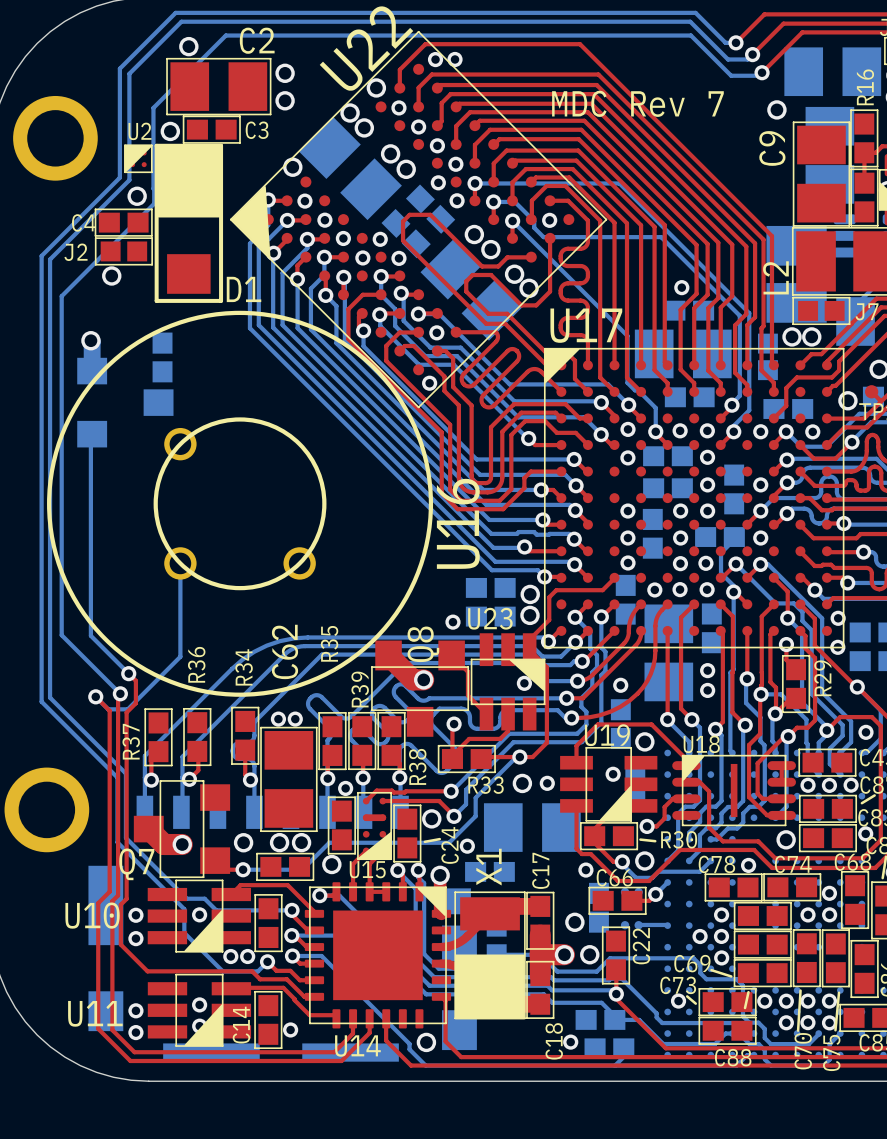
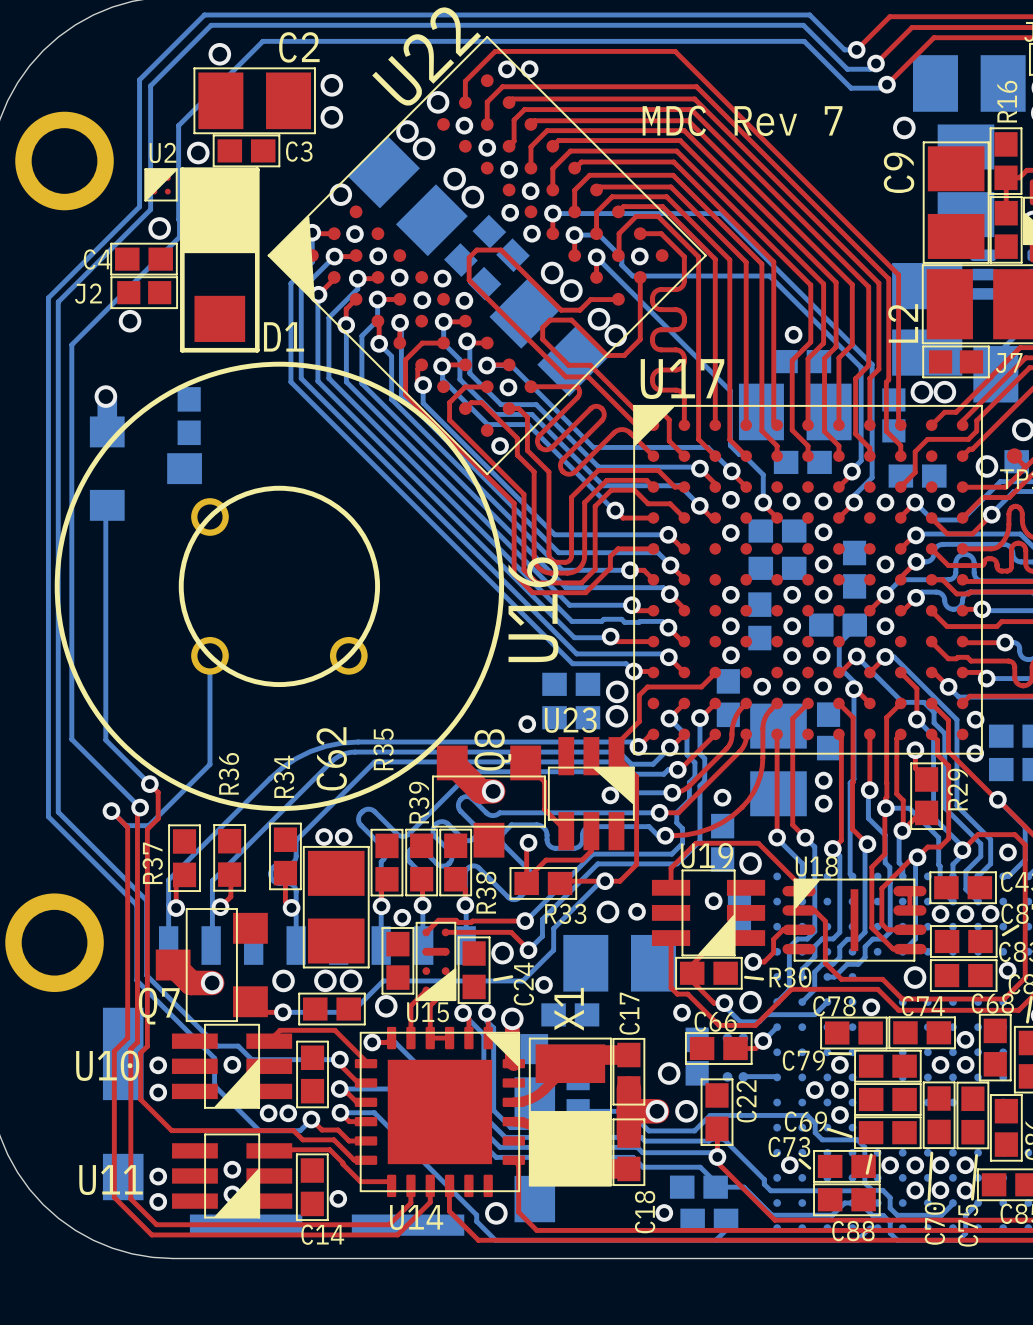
line: none -> (829, 1053) (850, 1053)
C79 name: none -> C79 (803, 1060)
C14 name rotation: 0° (241, 1025) -> 90° clockwise (322, 1234)

